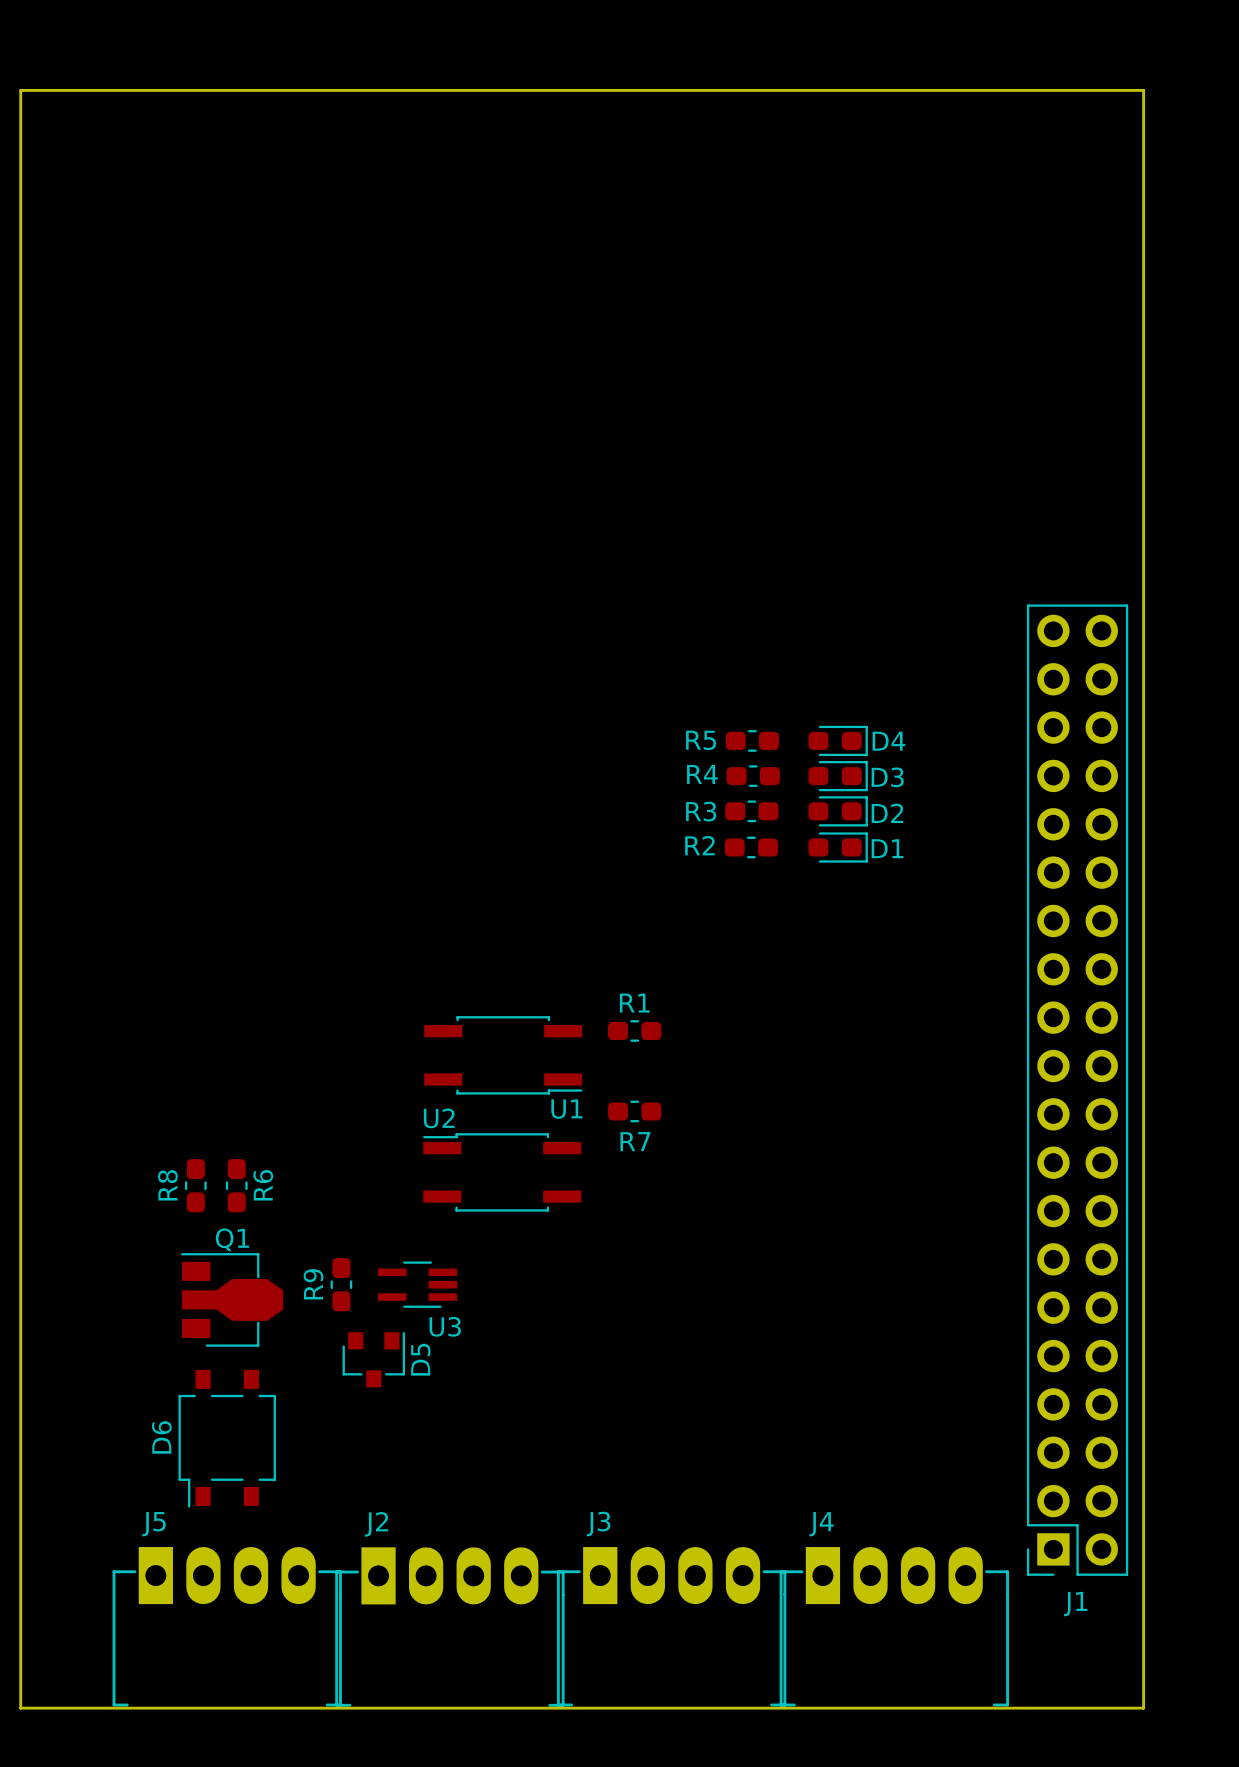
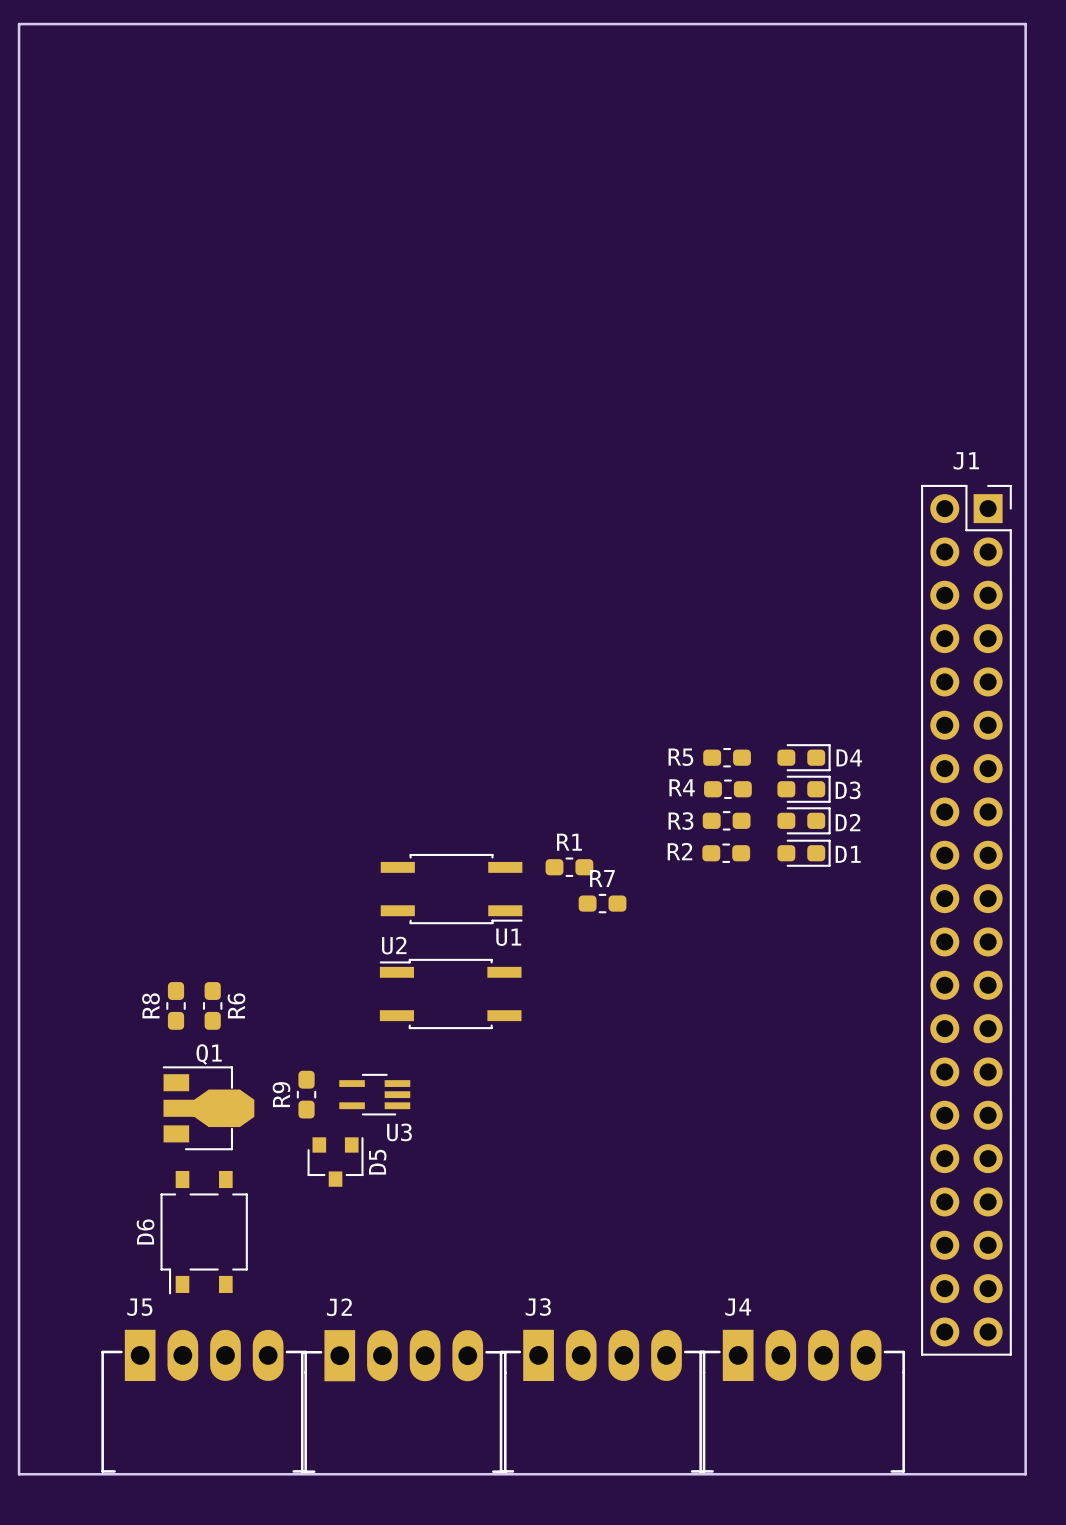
R5 position: (752, 740) -> (727, 757)
D4 position: (838, 740) -> (804, 757)
R4 position: (753, 776) -> (727, 789)
D3 position: (838, 776) -> (804, 789)
R3 position: (751, 811) -> (726, 820)
D2 position: (838, 811) -> (804, 820)
R2 position: (751, 847) -> (726, 853)
D1 position: (838, 847) -> (804, 853)
J1 rotation: 0° (1077, 1090) -> 180° (966, 920)
R7 position: (634, 1111) -> (602, 903)
R7 name position: R7 (635, 1141) -> R7 (602, 878)

